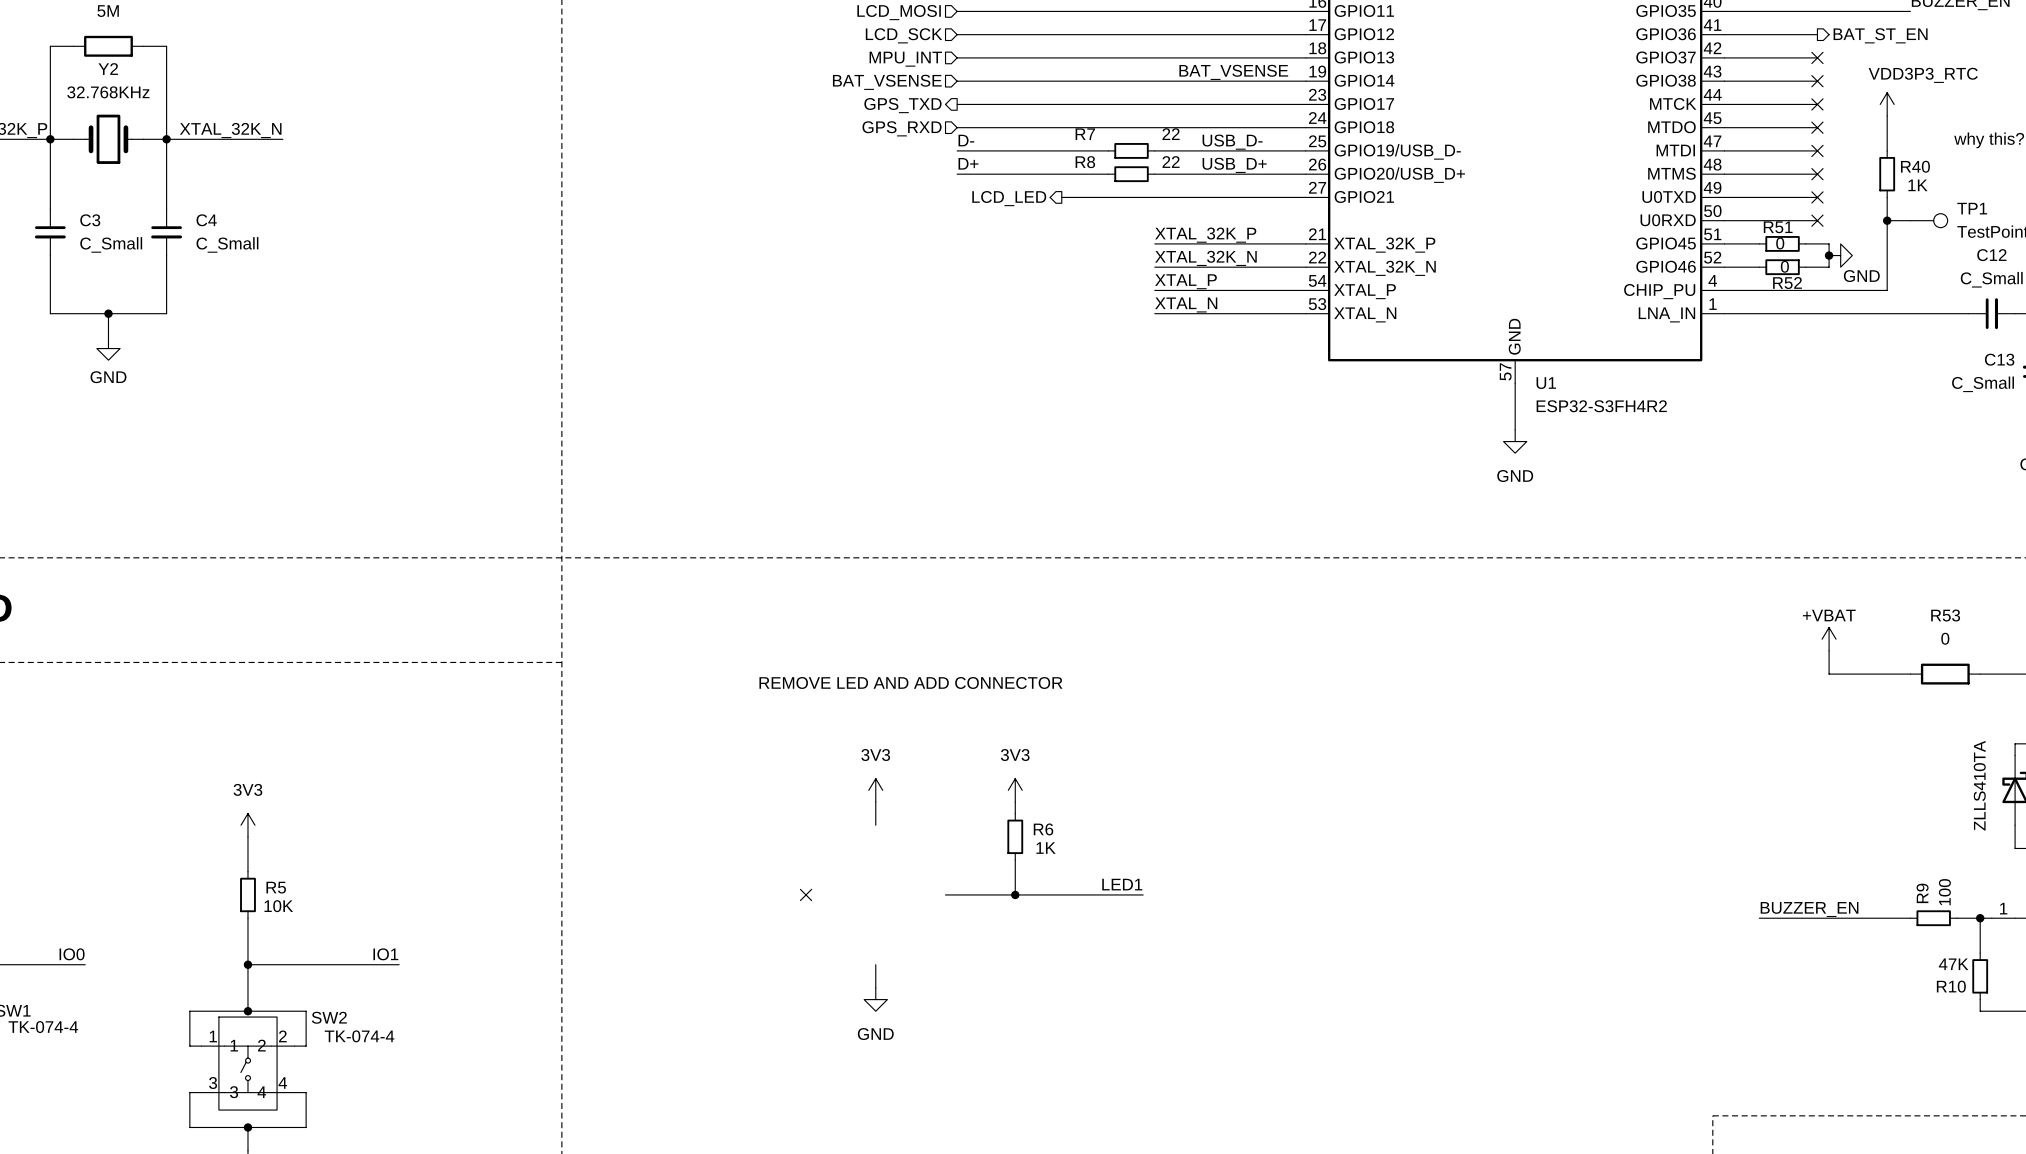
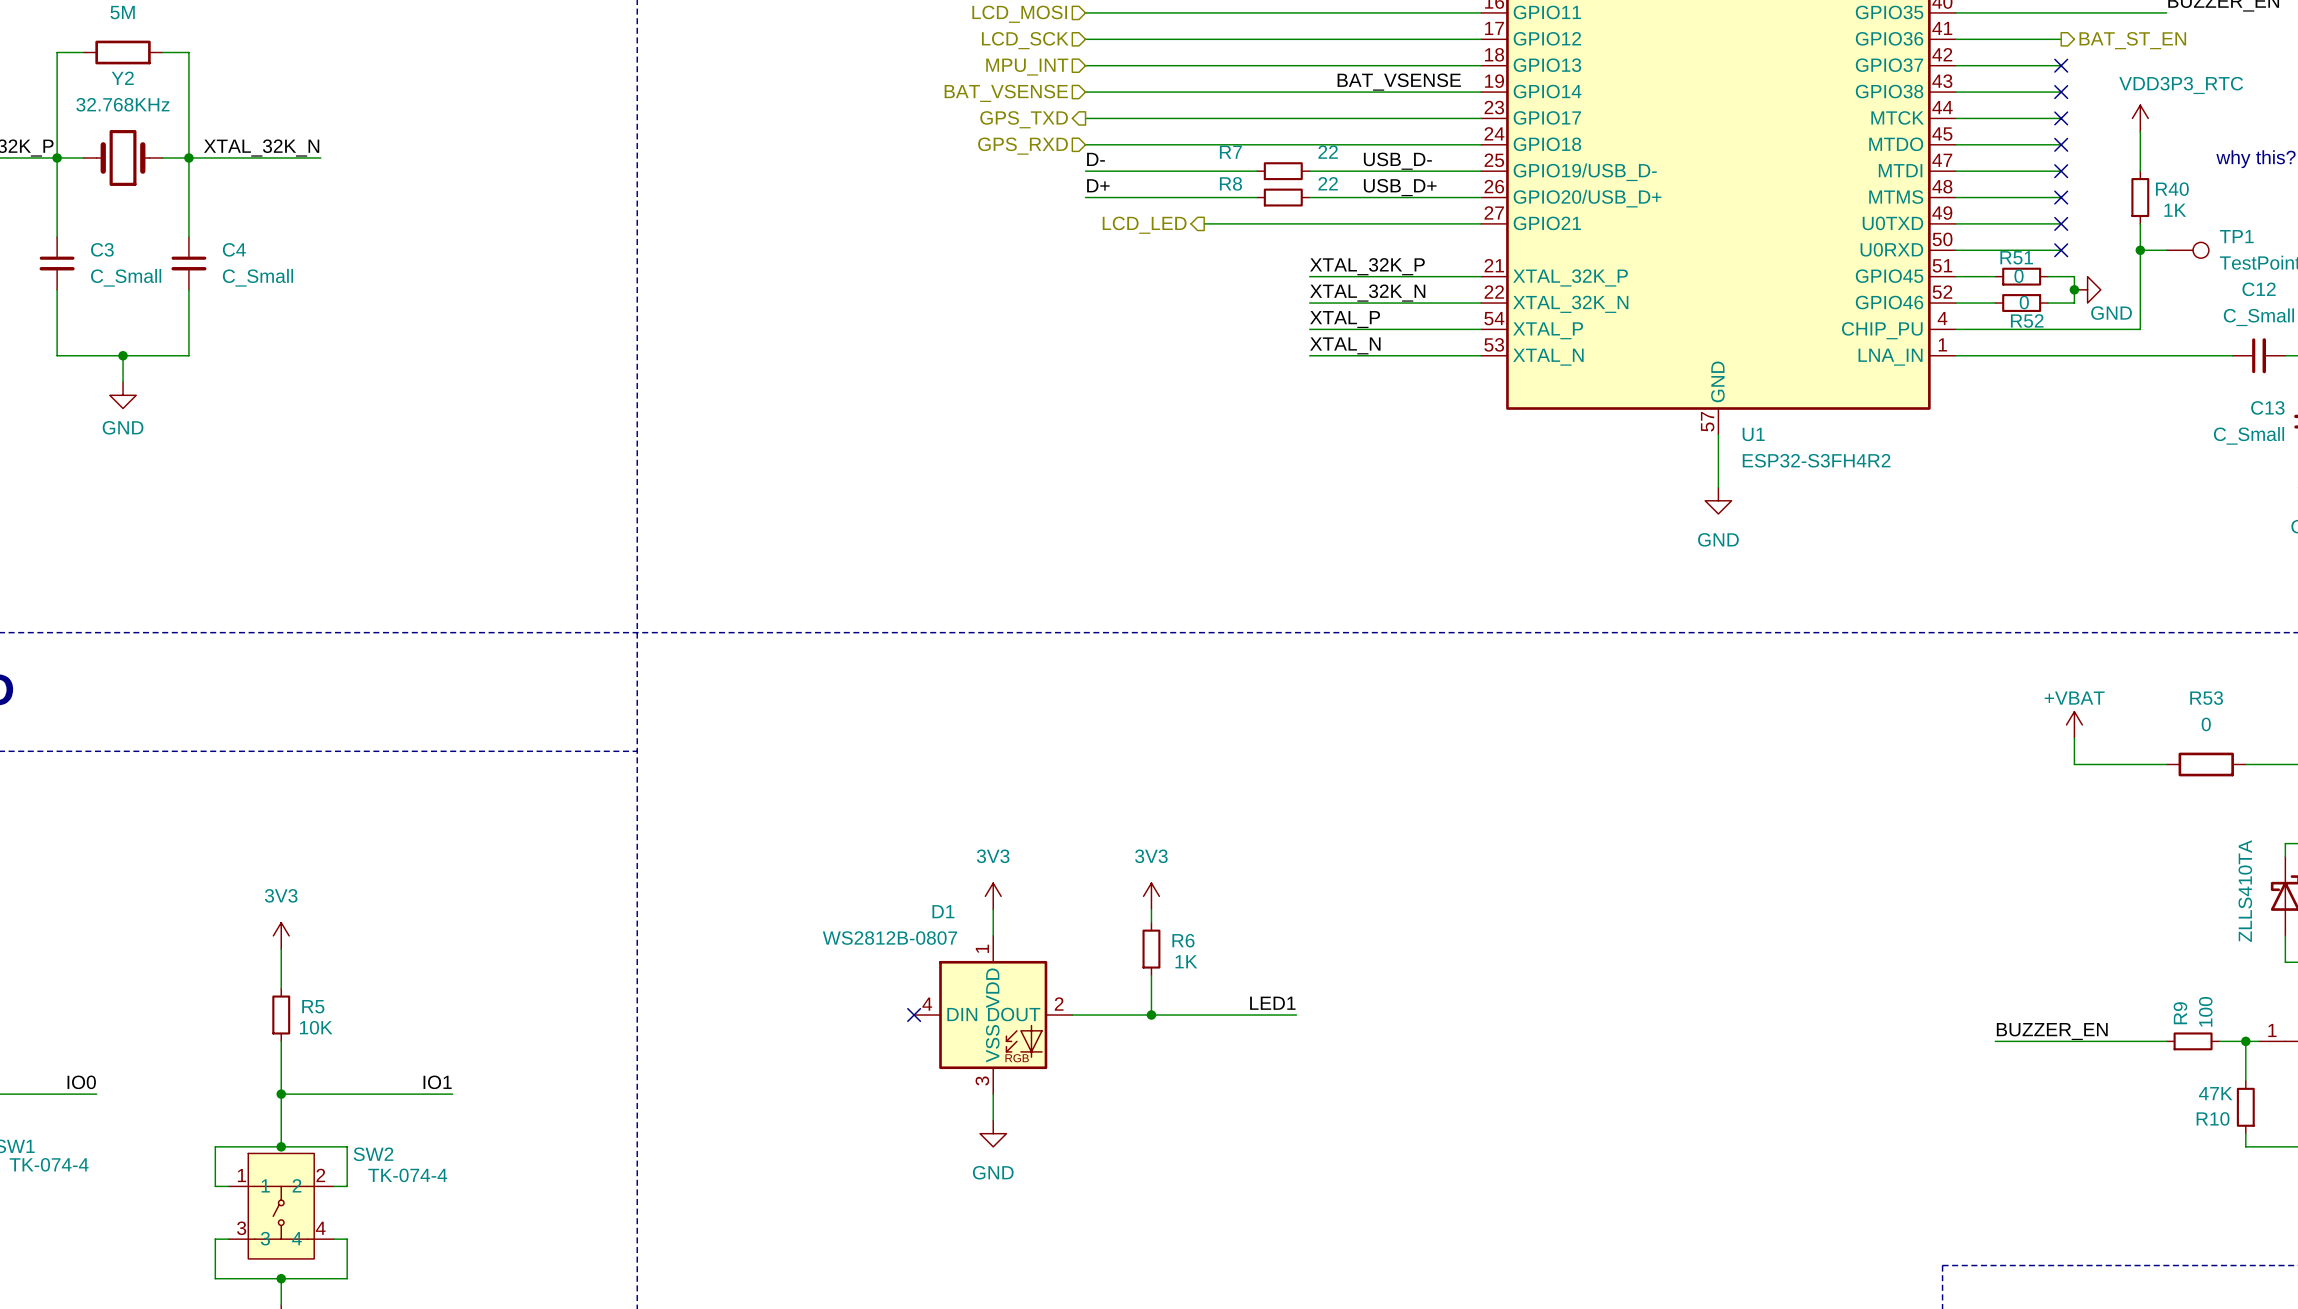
text: REMOVE LED AND ADD CONNECTOR (910, 682) -> none
D1: none -> WS2812B-0807 (993, 1015)

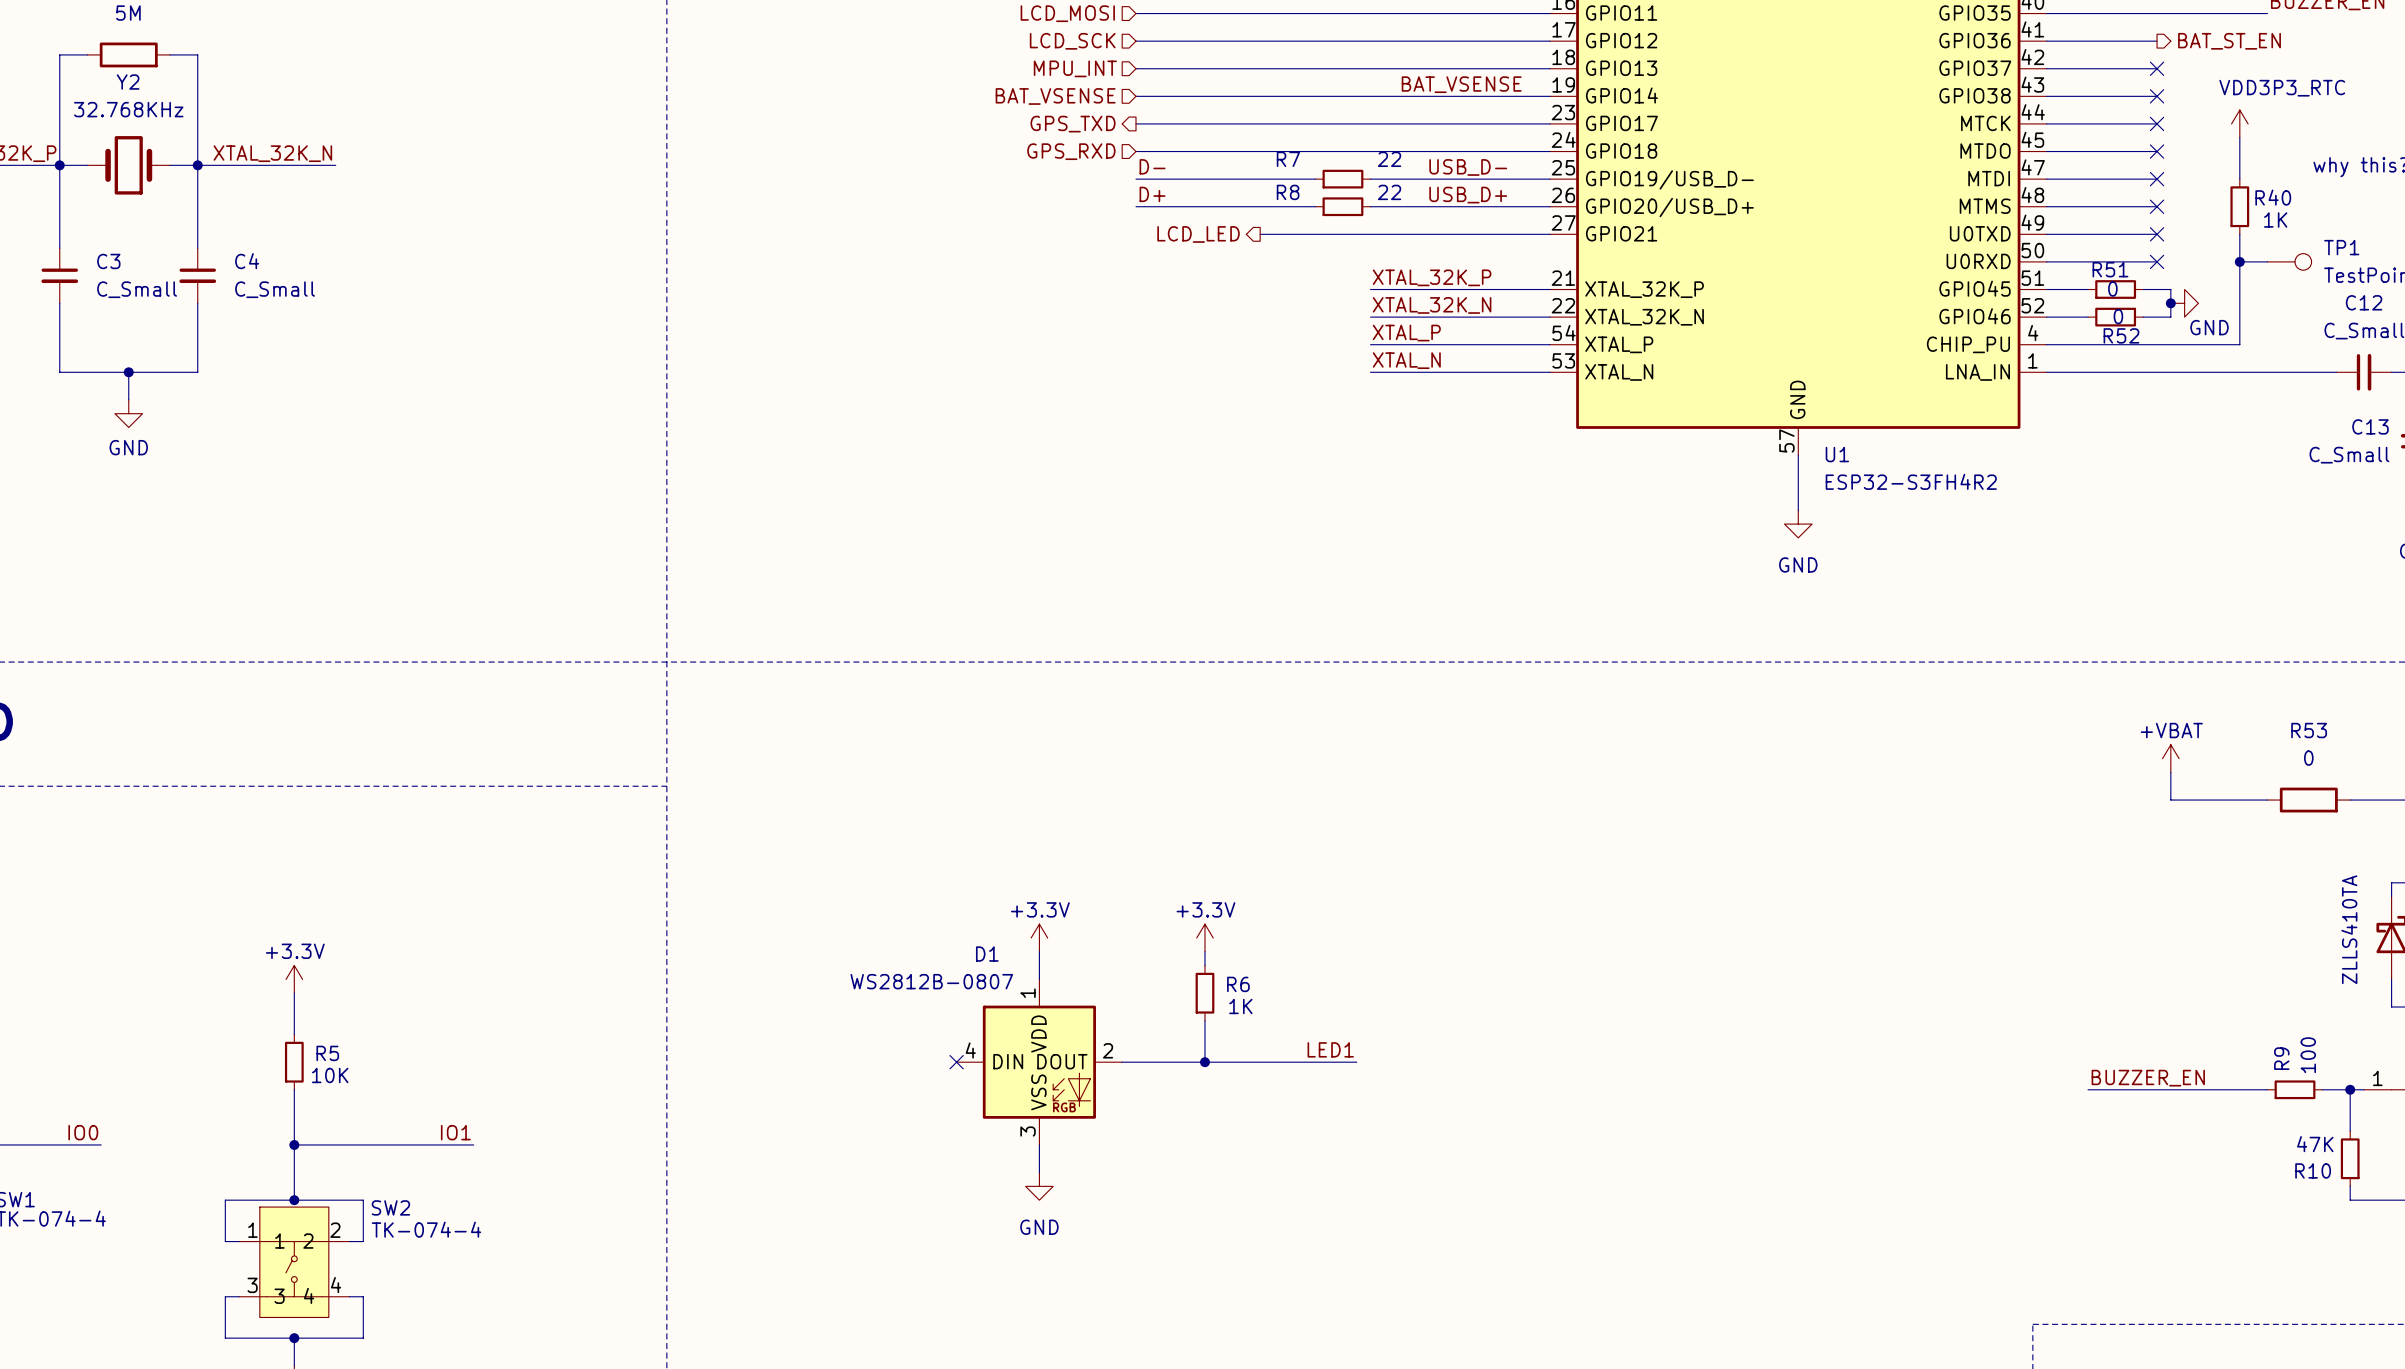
power symbol: 3V3 (993, 896) -> +3.3V (1039, 938)
power symbol: 3V3 (1151, 896) -> +3.3V (1204, 938)
power symbol: 3V3 (281, 935) -> +3.3V (294, 979)

